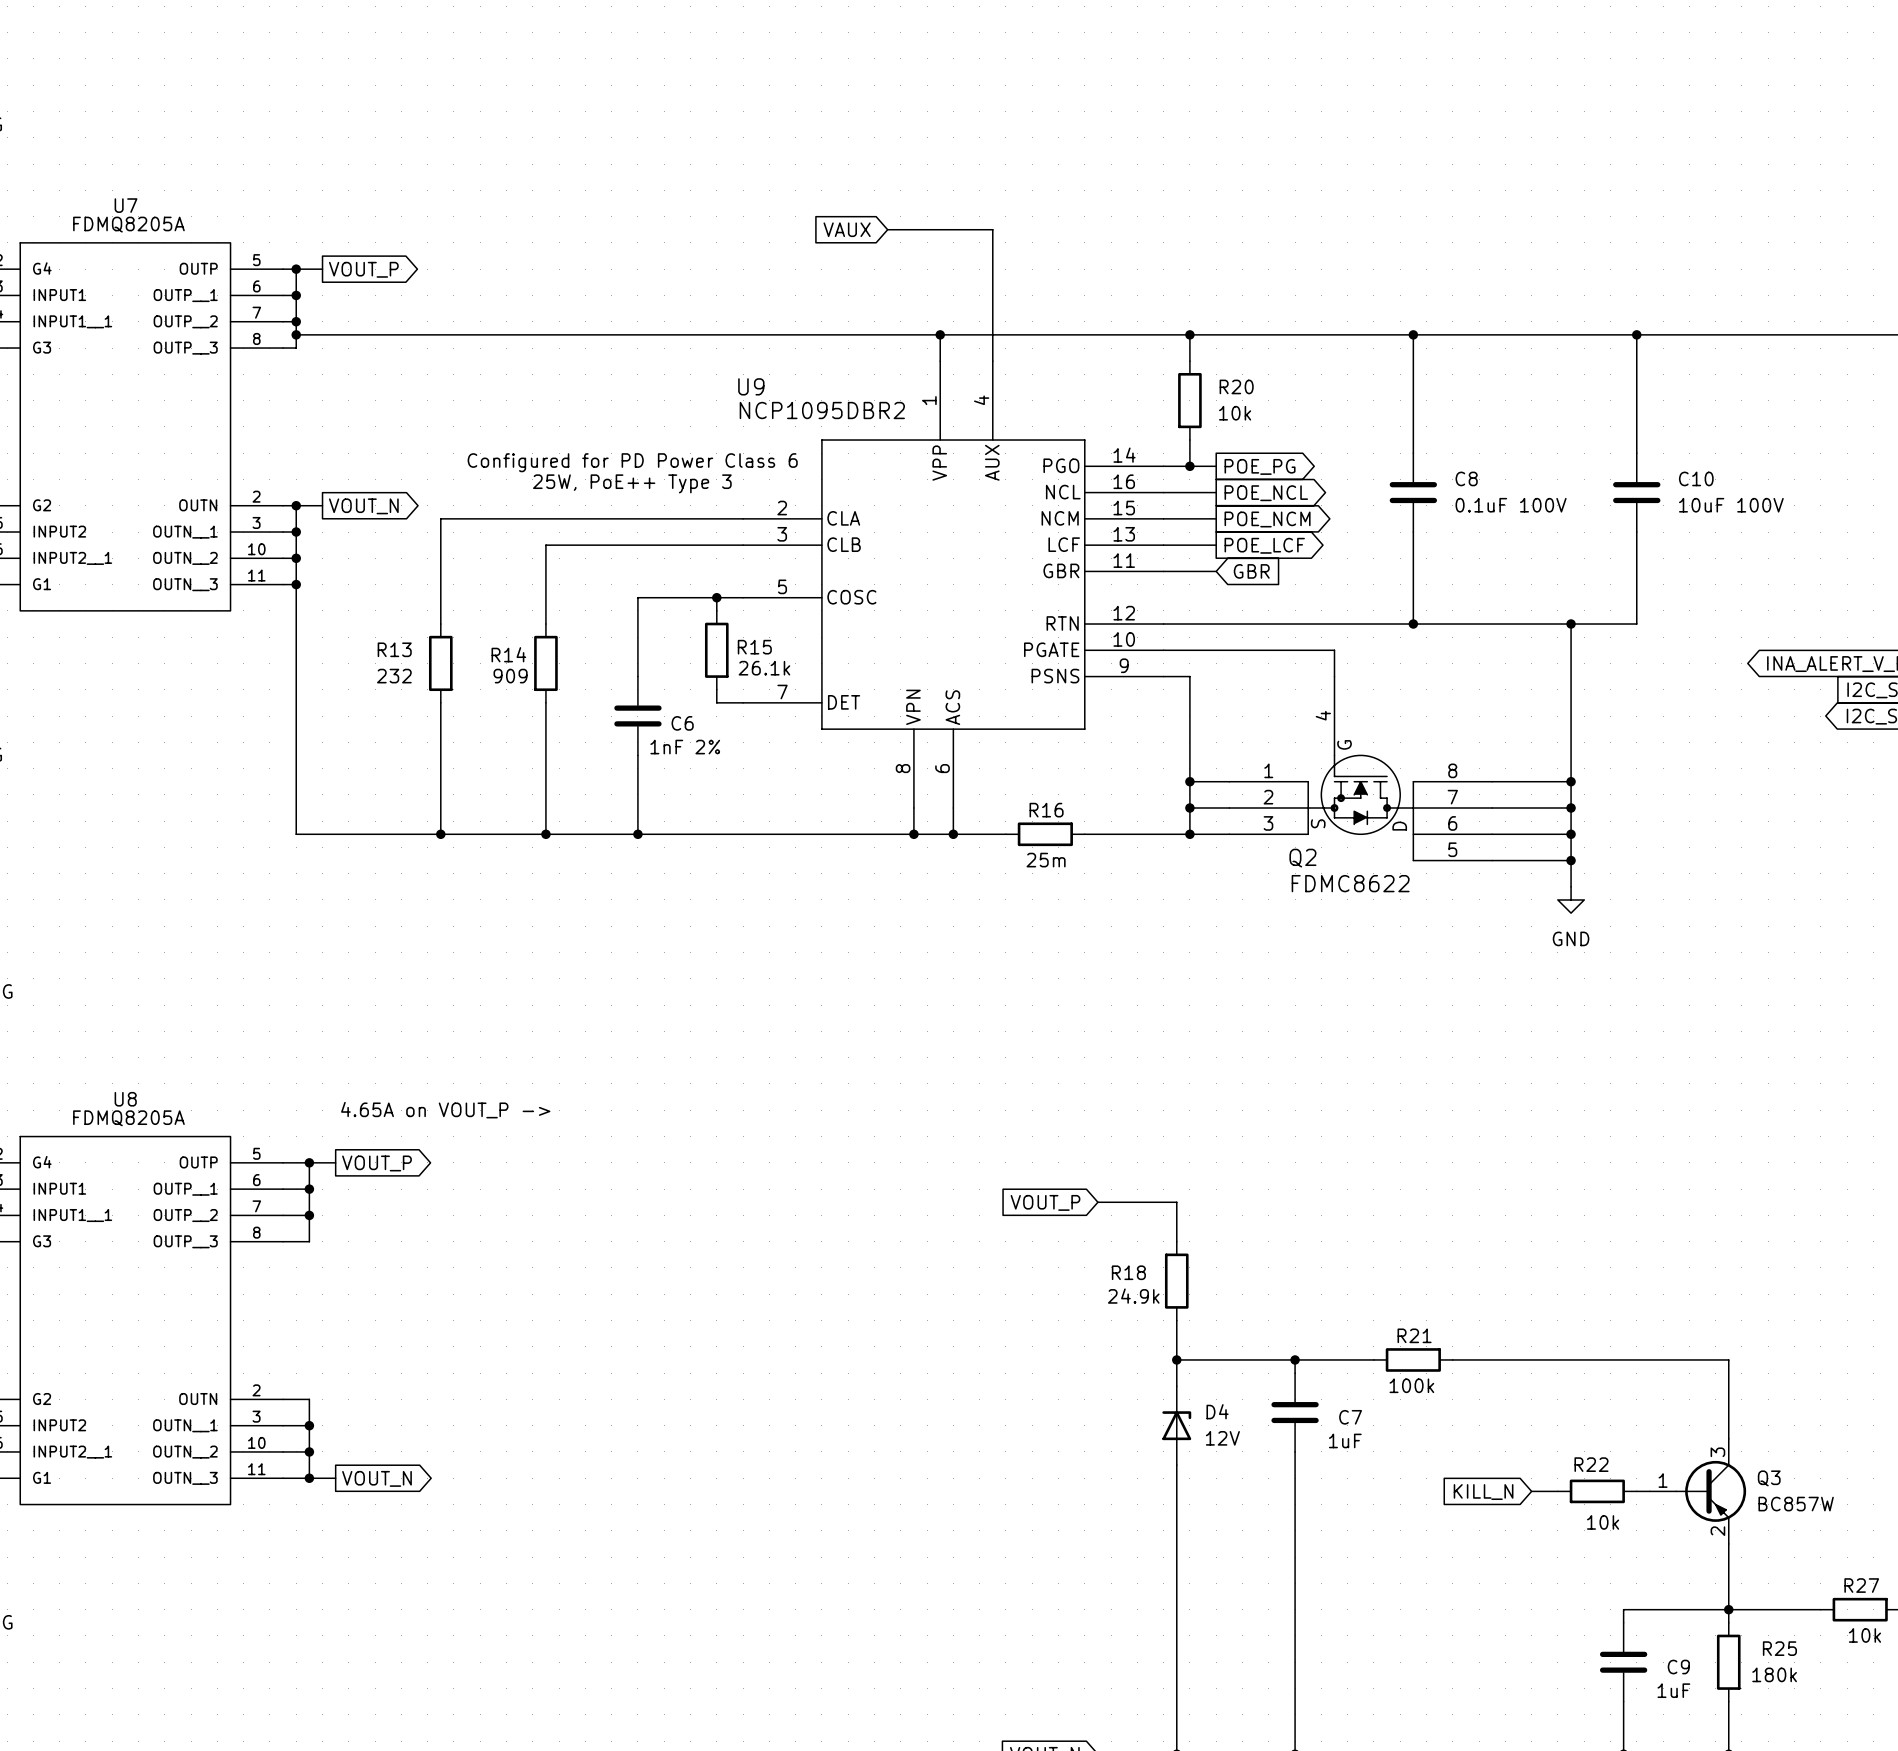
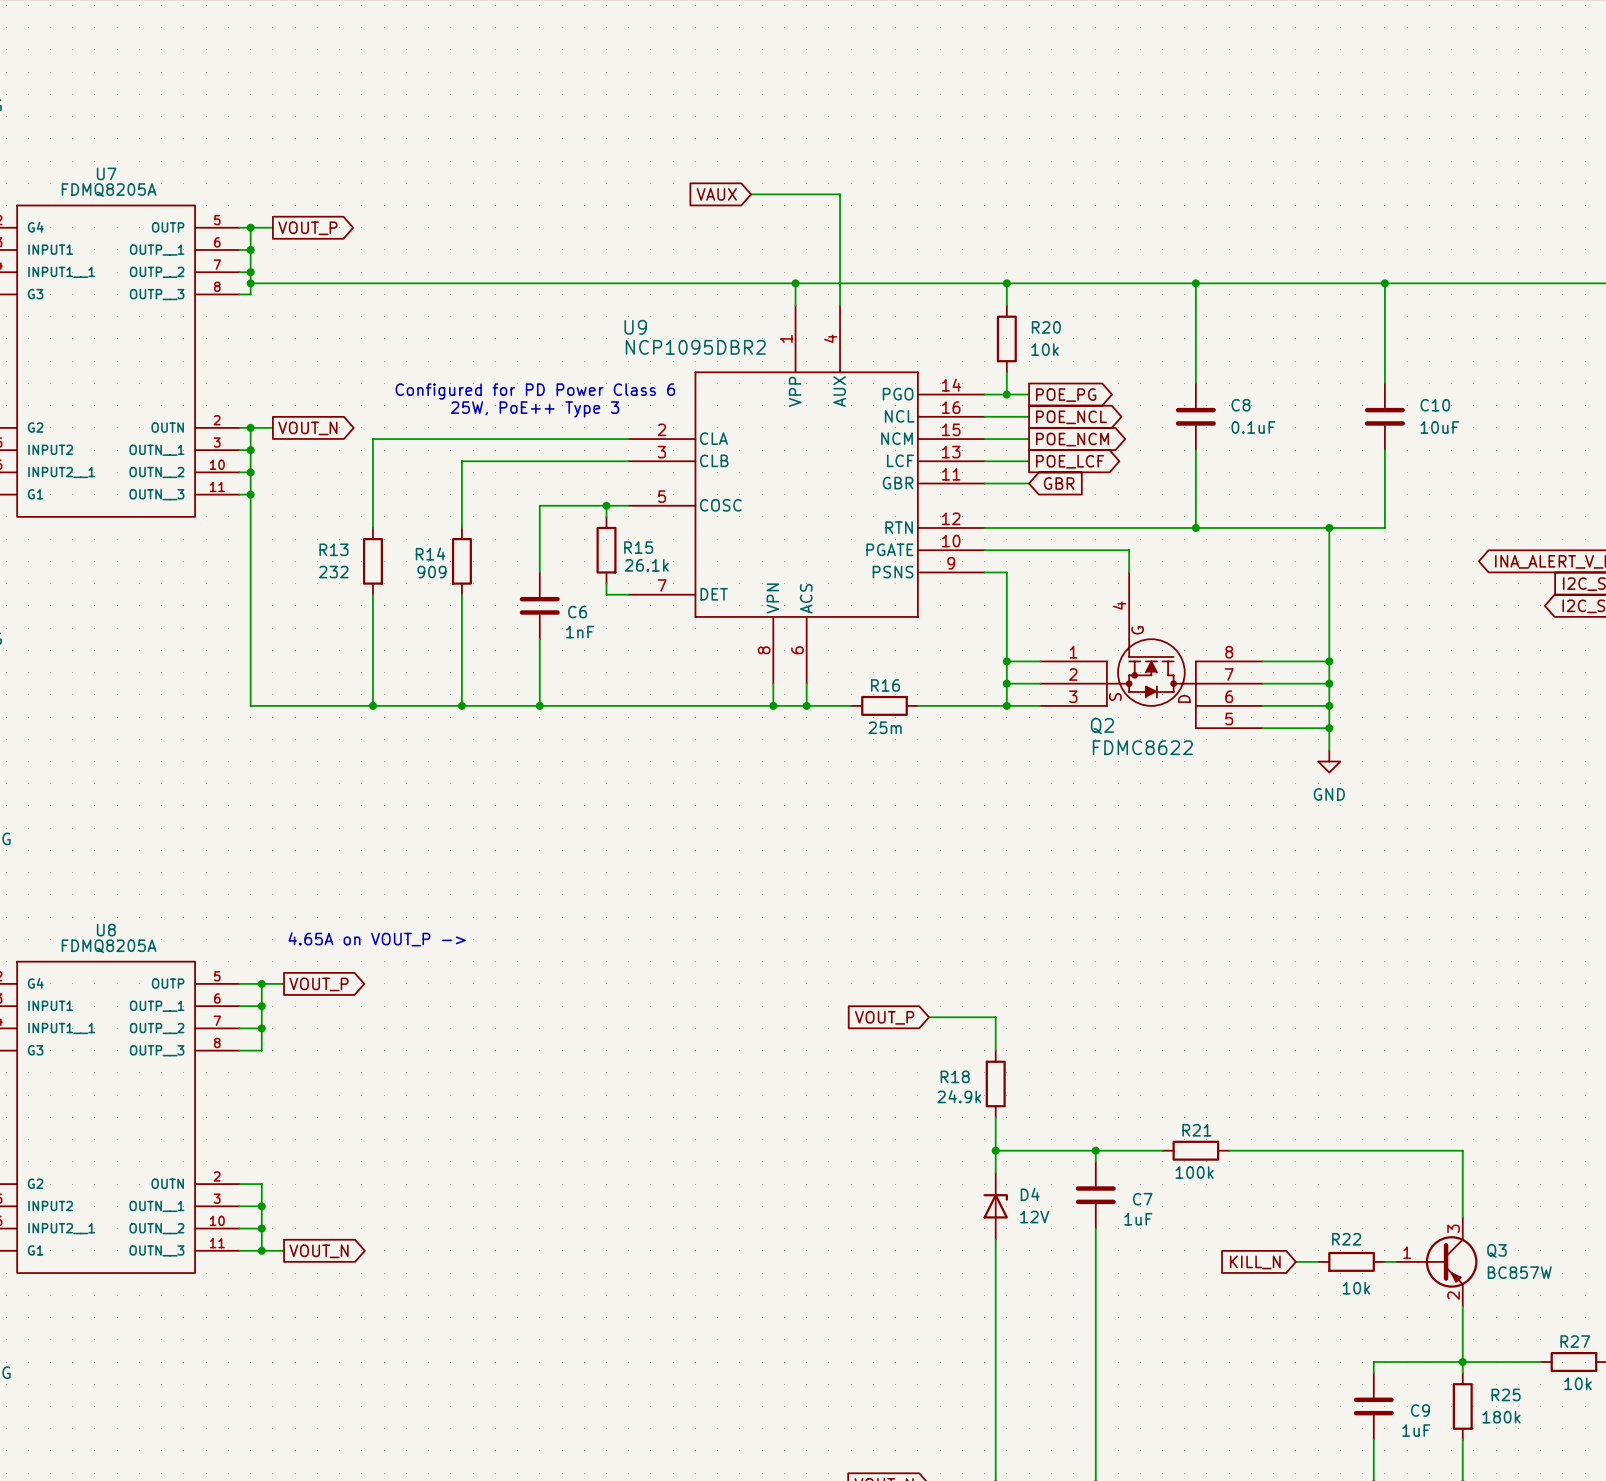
C8 value: 0.1uF 100V (1511, 505) -> 0.1uF (1253, 427)
C10 value: 10uF 100V (1731, 505) -> 10uF (1439, 427)
C6 value: 1nF 2% (685, 747) -> 1nF (580, 632)

